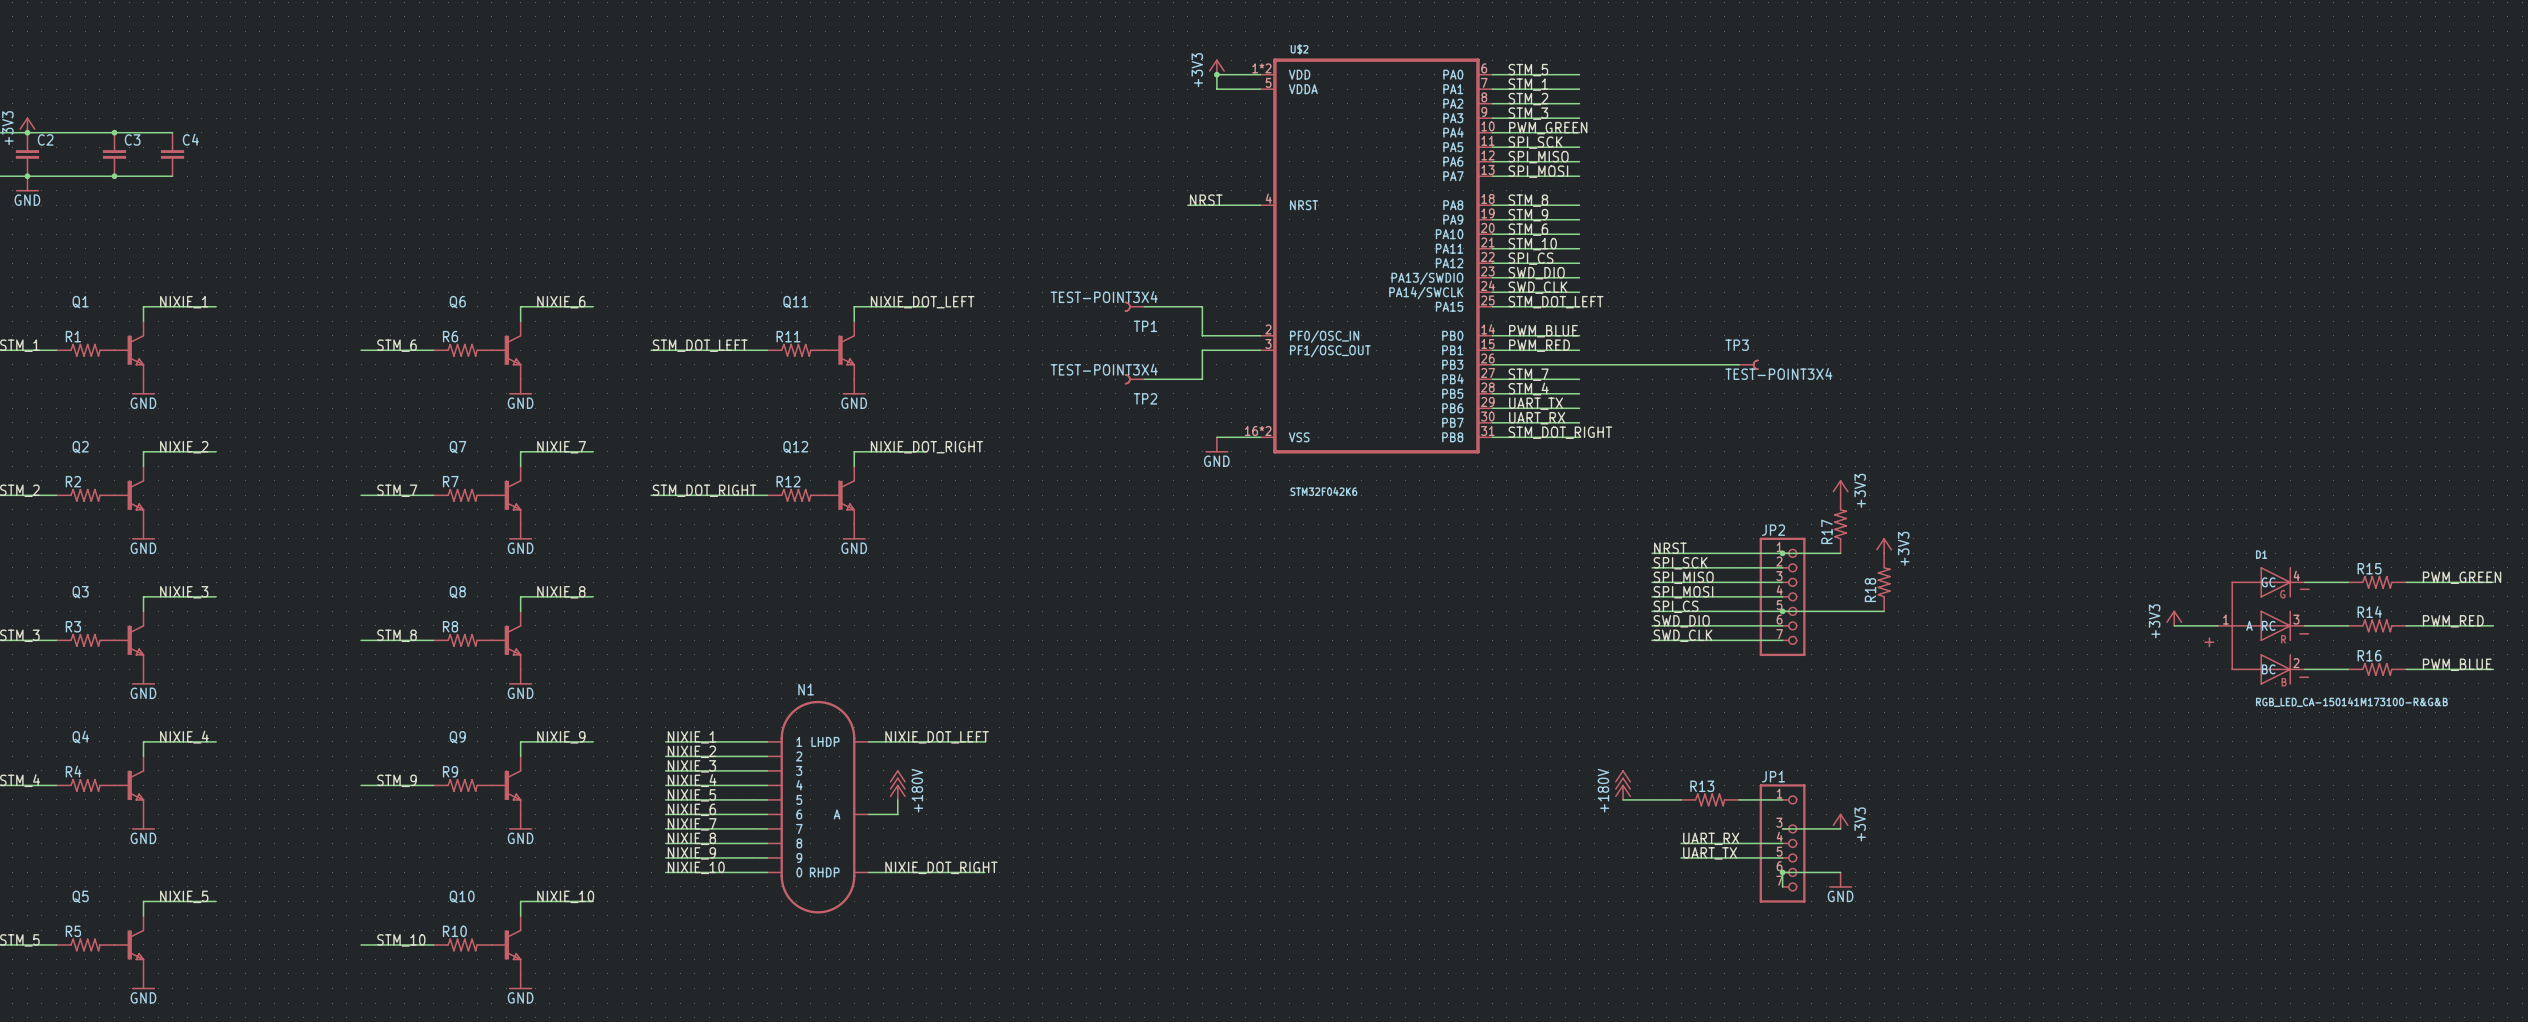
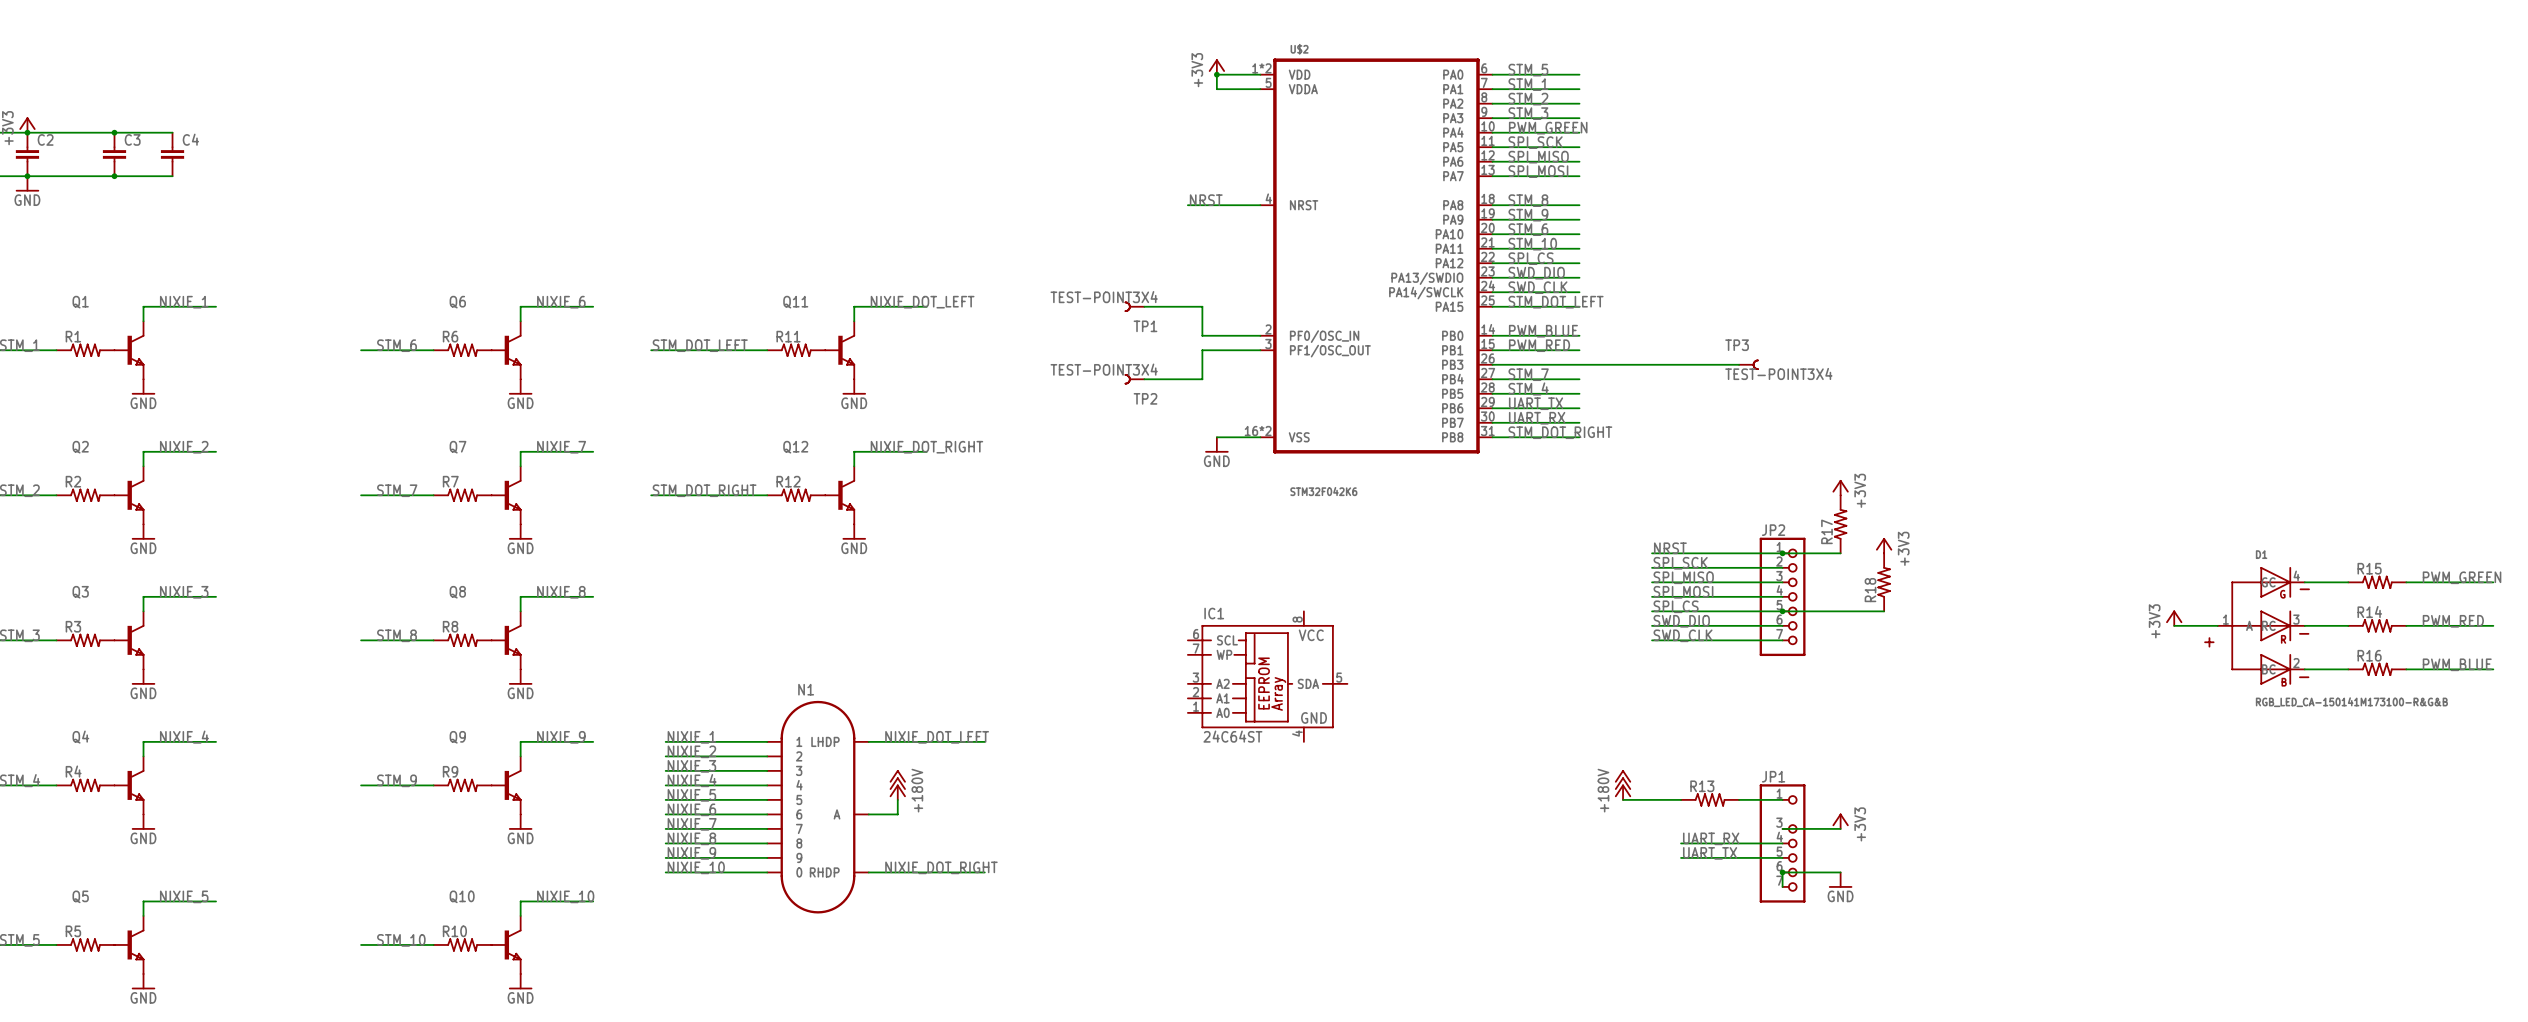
IC1: none -> 24C64ST (1267, 676)

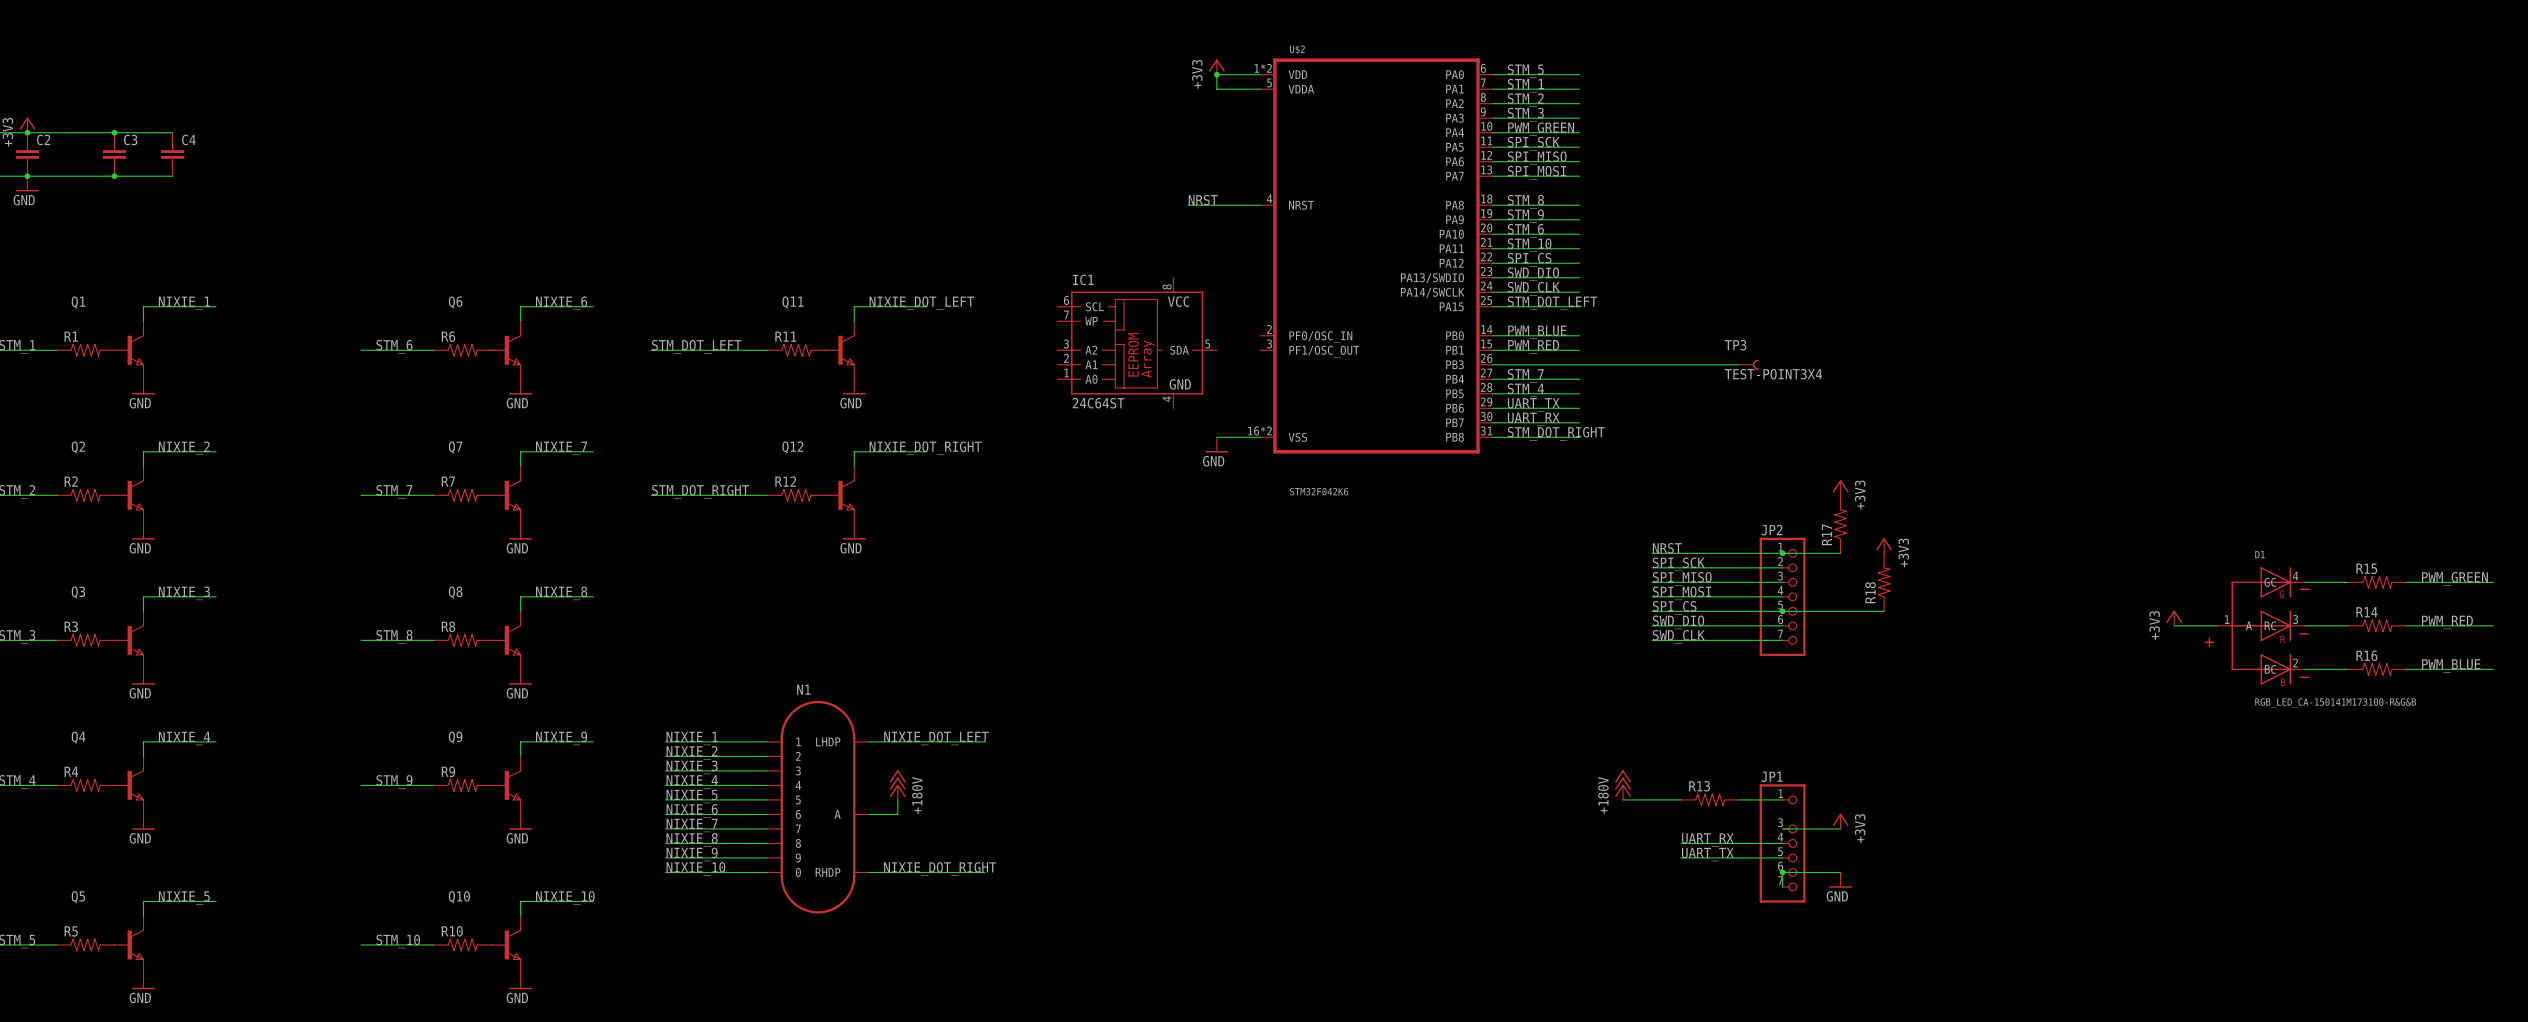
TP1: TEST-POINT3X4 (1134, 306) -> none
wire: (1144, 306) (1202, 306) (1202, 335) (1260, 335) -> none
wire: (1260, 350) (1202, 350) (1202, 379) (1144, 379) -> none
TP2: TEST-POINT3X4 (1134, 379) -> none
IC1 position: (1267, 676) -> (1137, 343)

